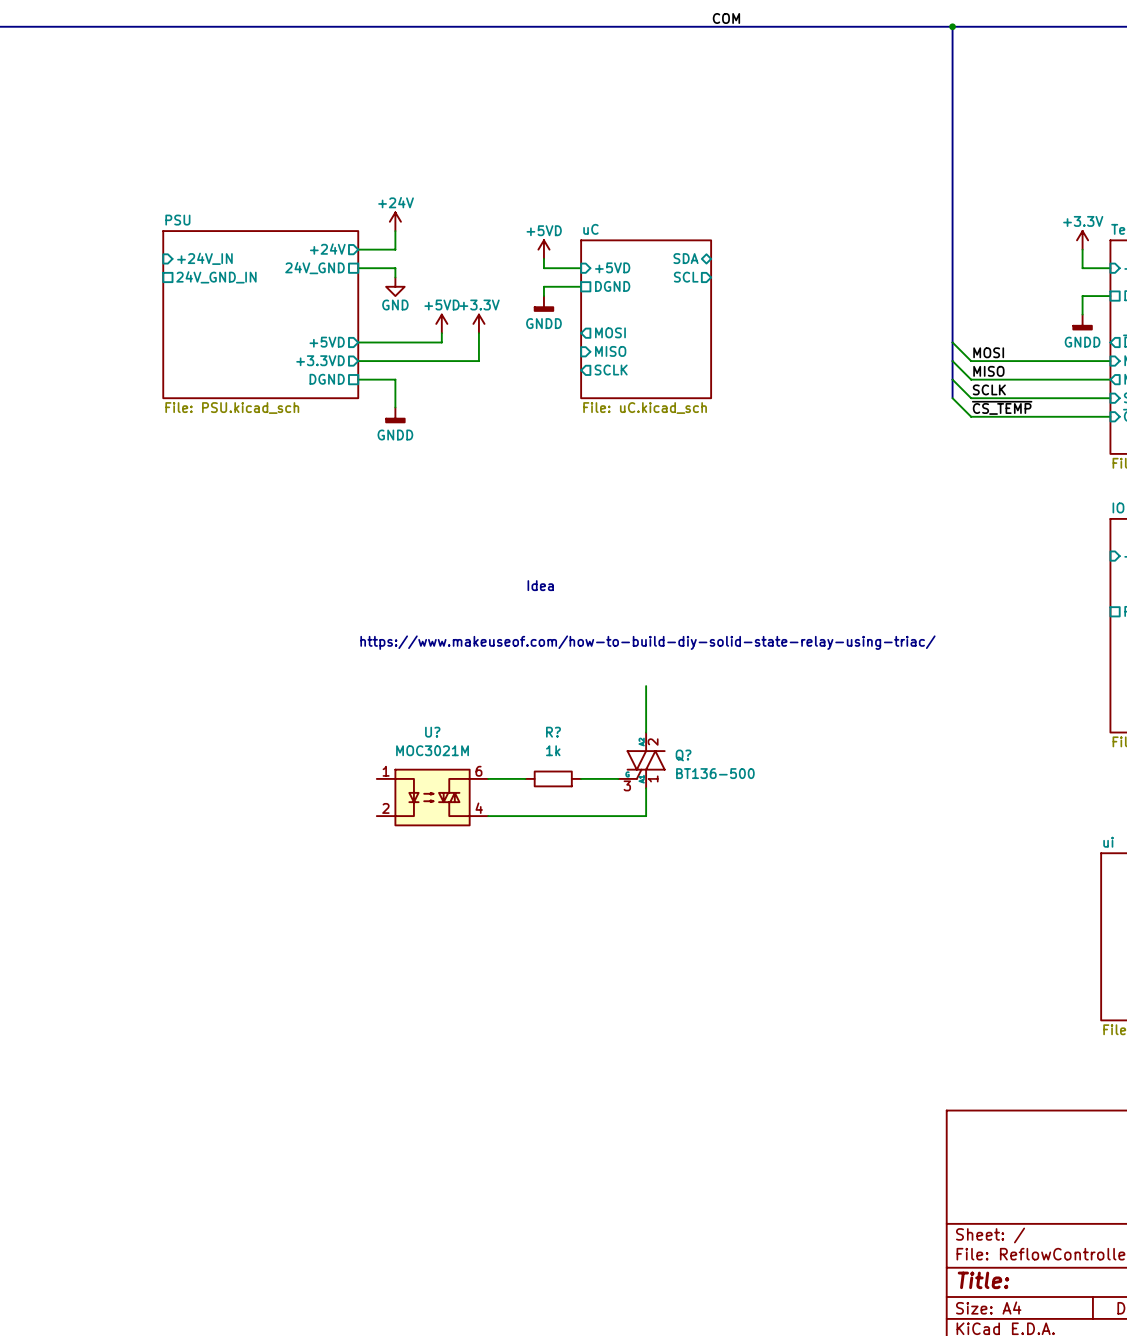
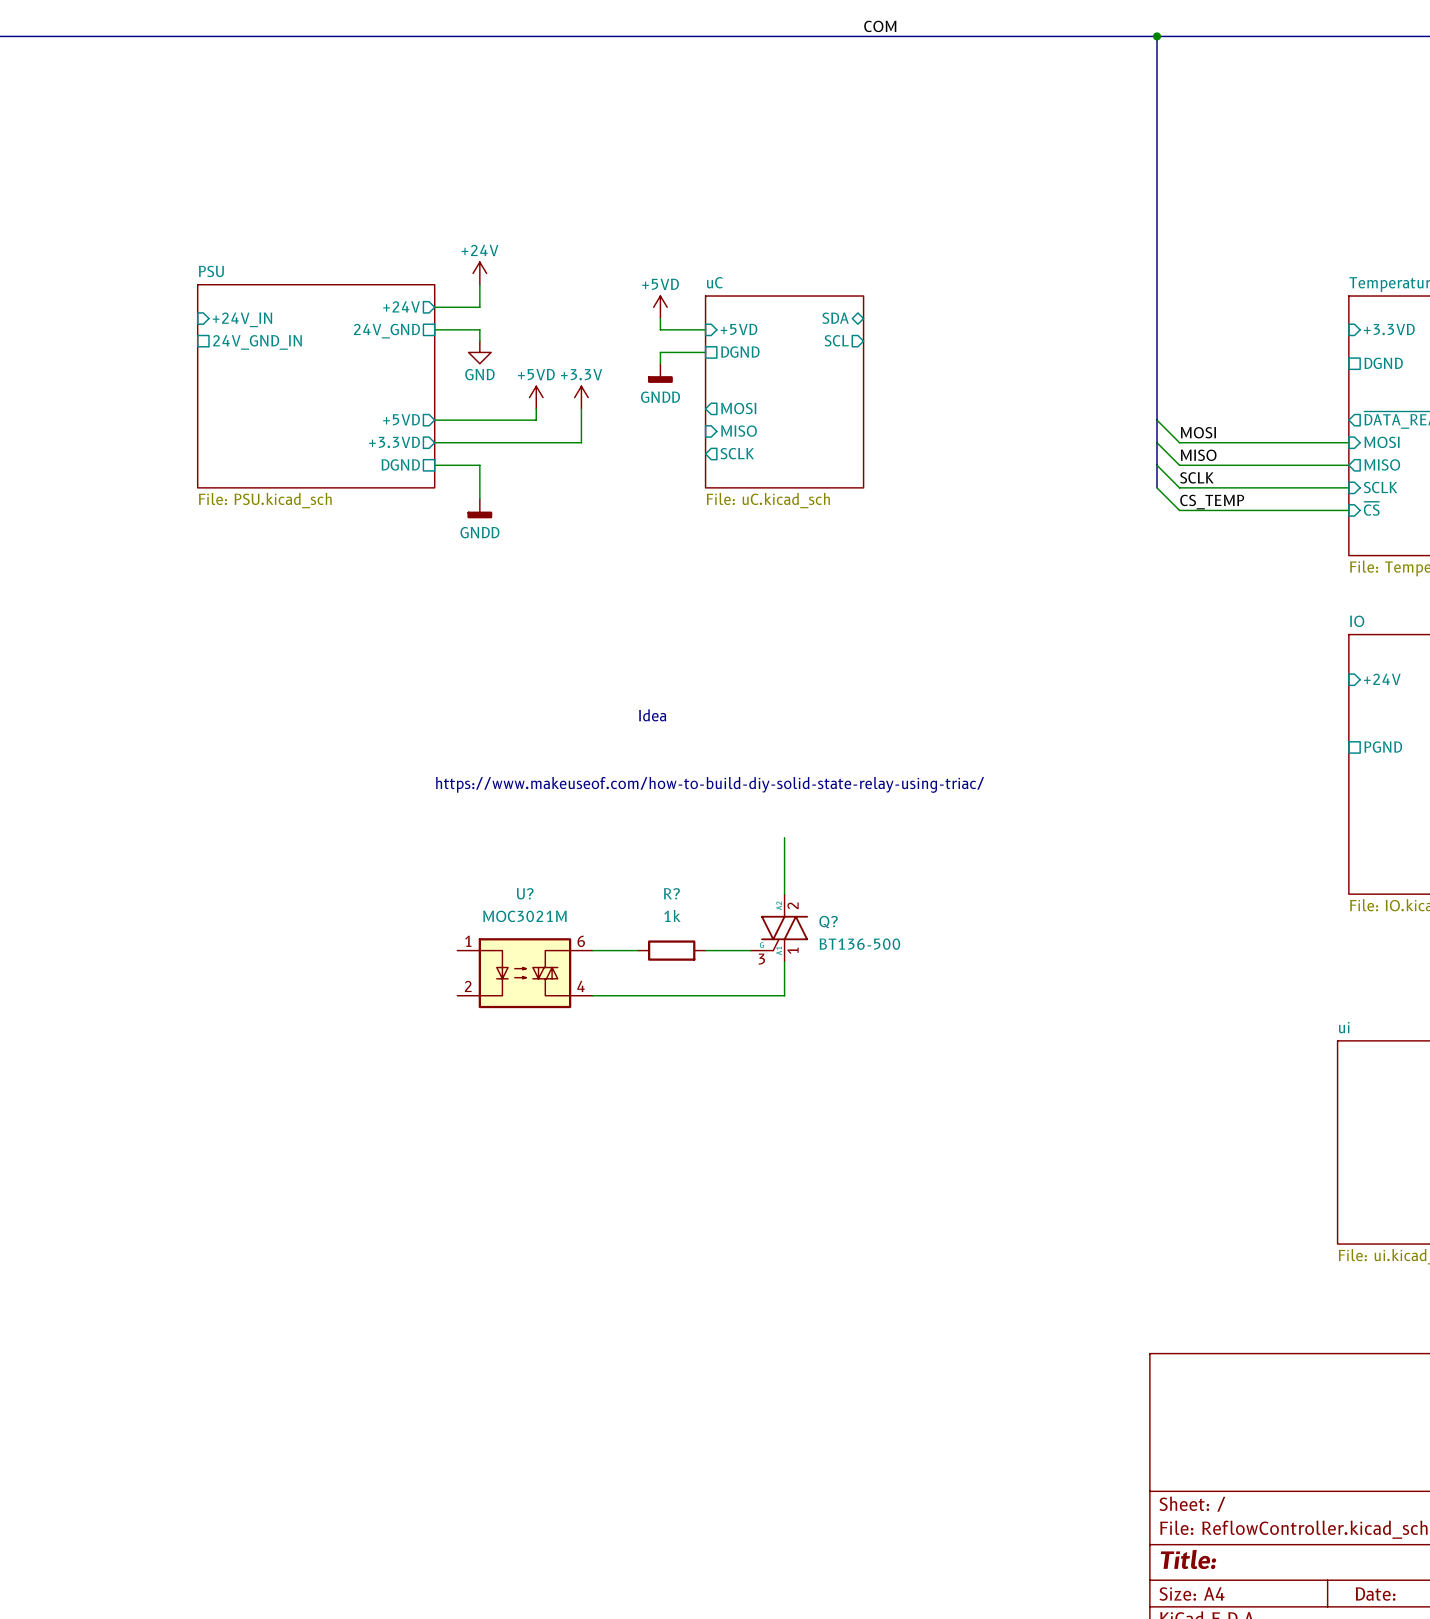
power symbol: +3.3V (1082, 240) -> none
wire: (1082, 249) (1082, 268) (1110, 268) -> none
wire: (1110, 296) (1082, 296) (1082, 314) -> none
power symbol: GNDD (1082, 322) -> none
label: ~{CS_TEMP} (1002, 407) -> CS_TEMP (1212, 502)

